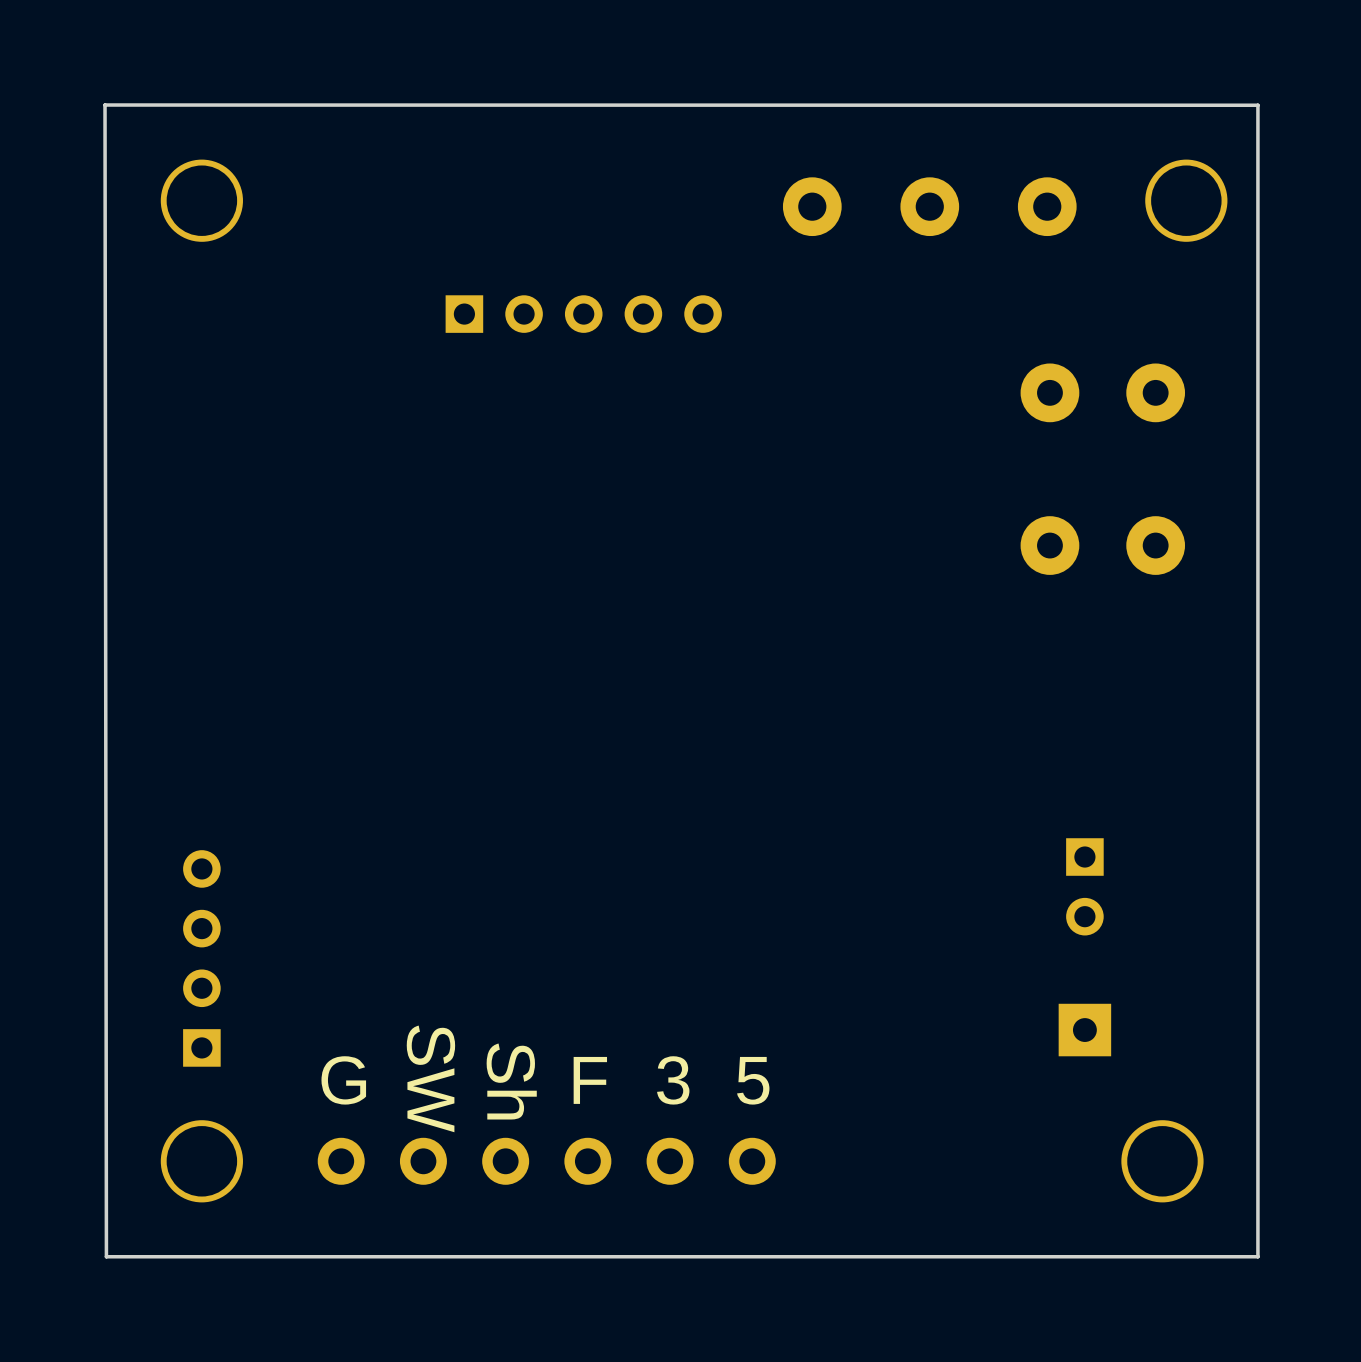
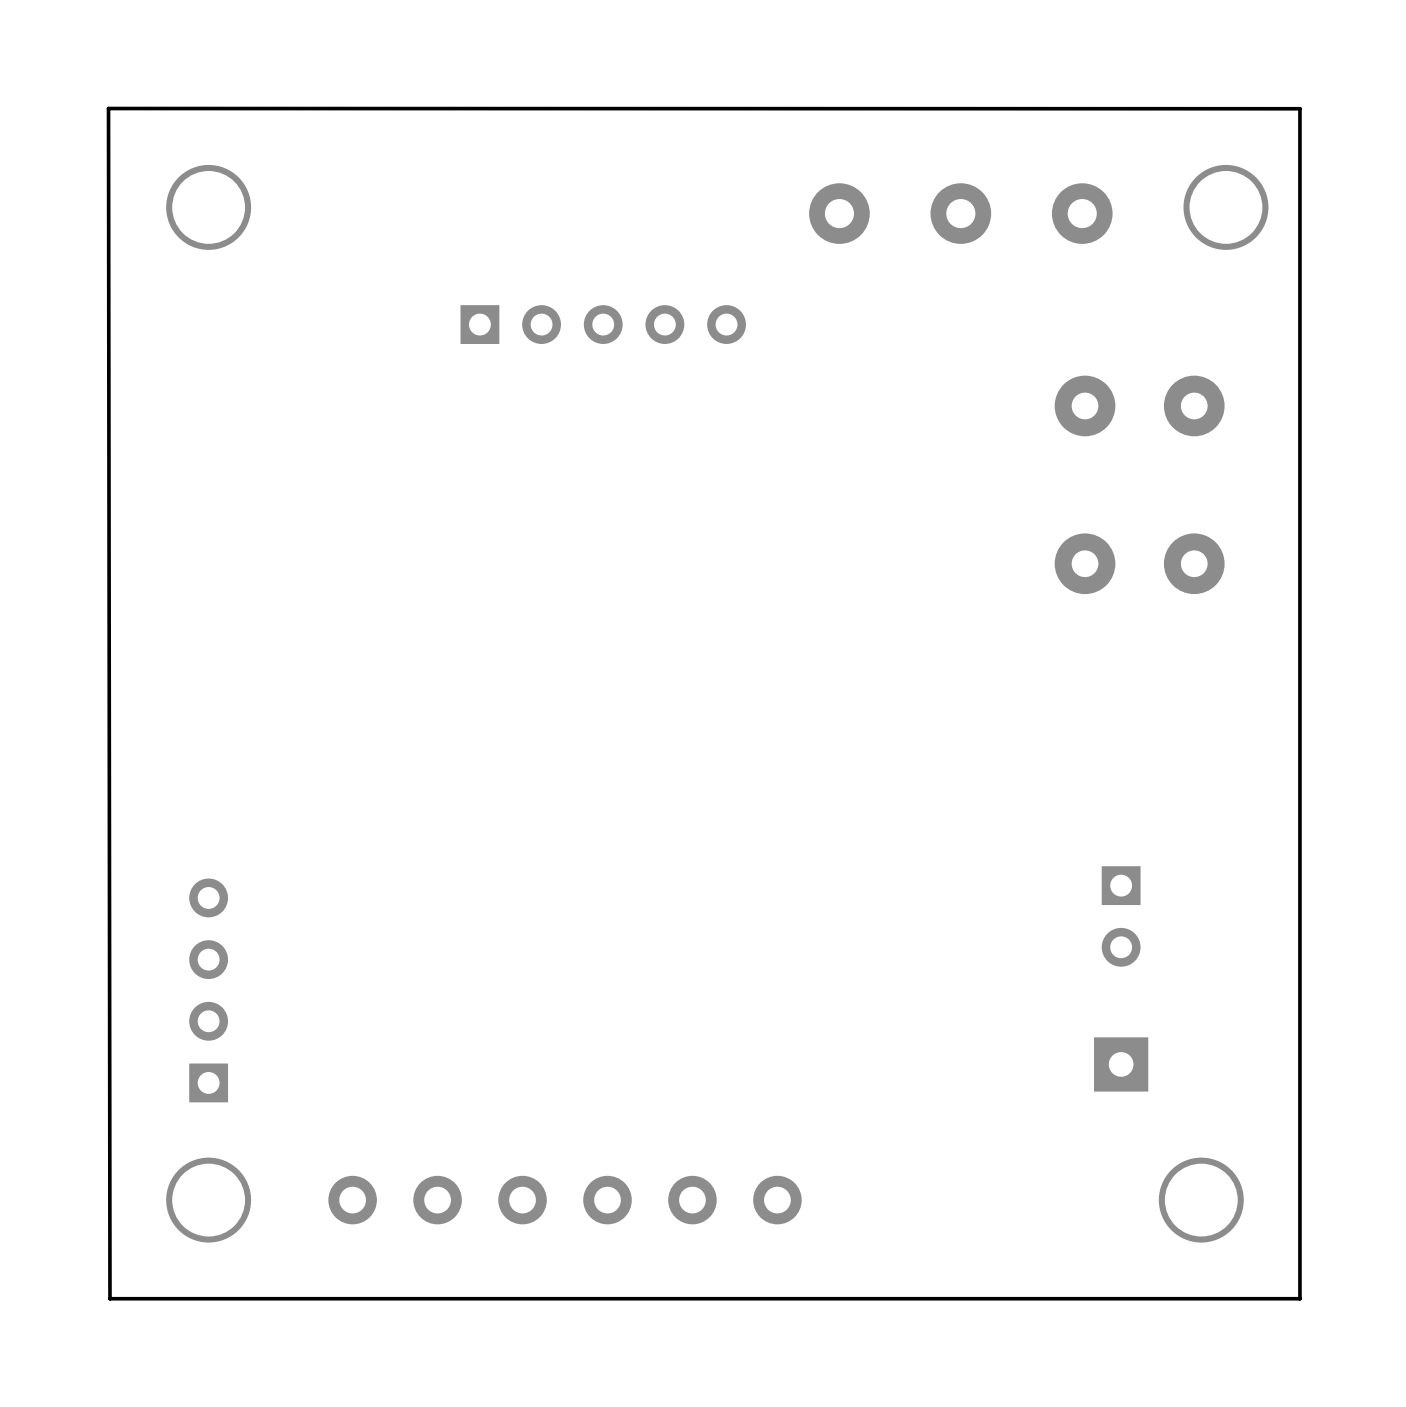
text: SW (430, 1078) -> none
text: G (343, 1080) -> none
text: F (590, 1080) -> none
text: 3 (673, 1080) -> none
text: 5 (753, 1080) -> none
text: Sh (511, 1081) -> none

